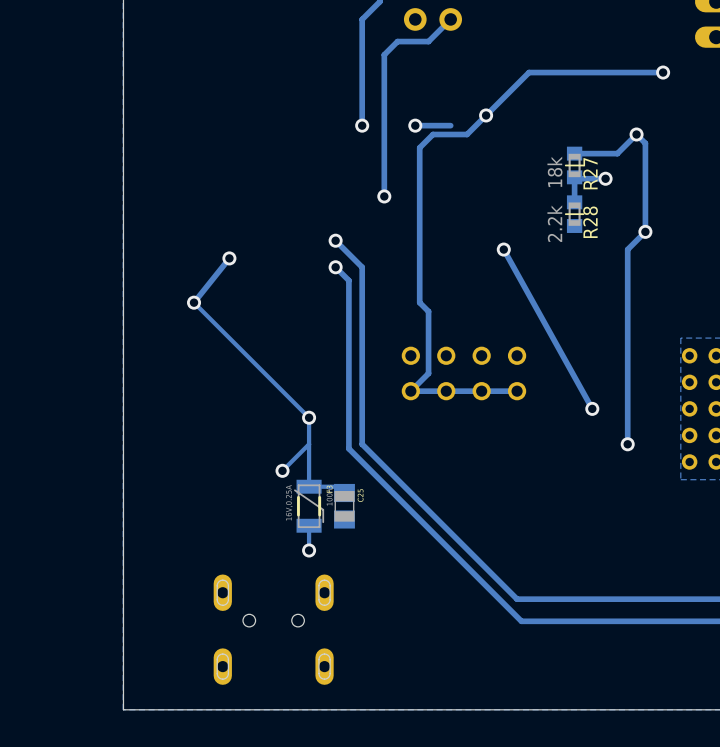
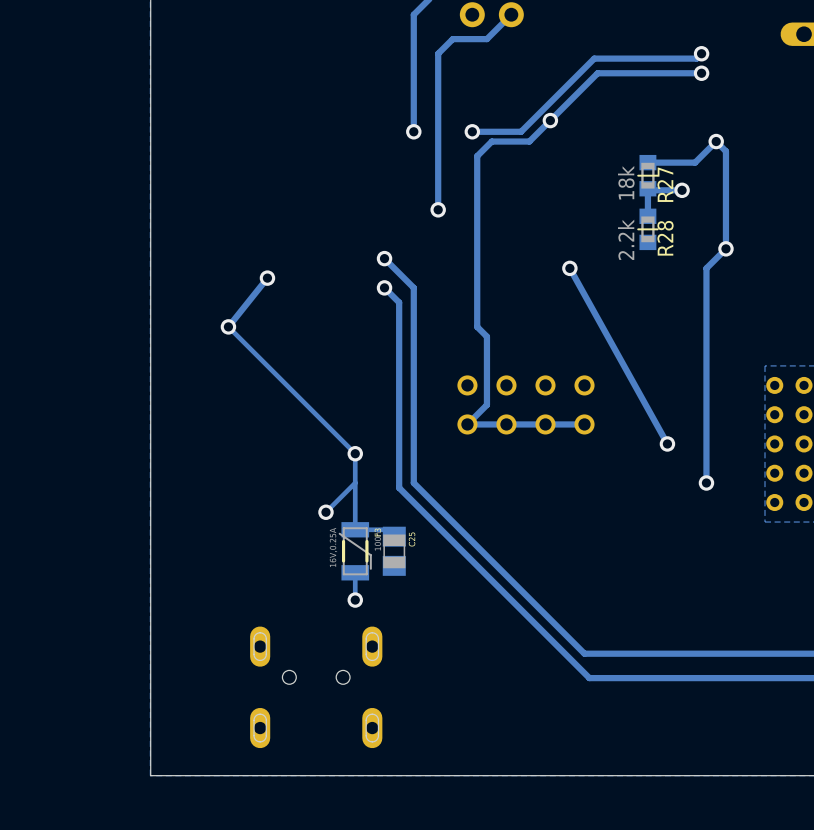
track: none -> (701, 53) (696, 58) (594, 58) (521, 131) (511, 131)
via: none -> (701, 53)
via: none -> (701, 73)
track: (663, 72) (623, 72) -> none
via: (663, 72) -> none

